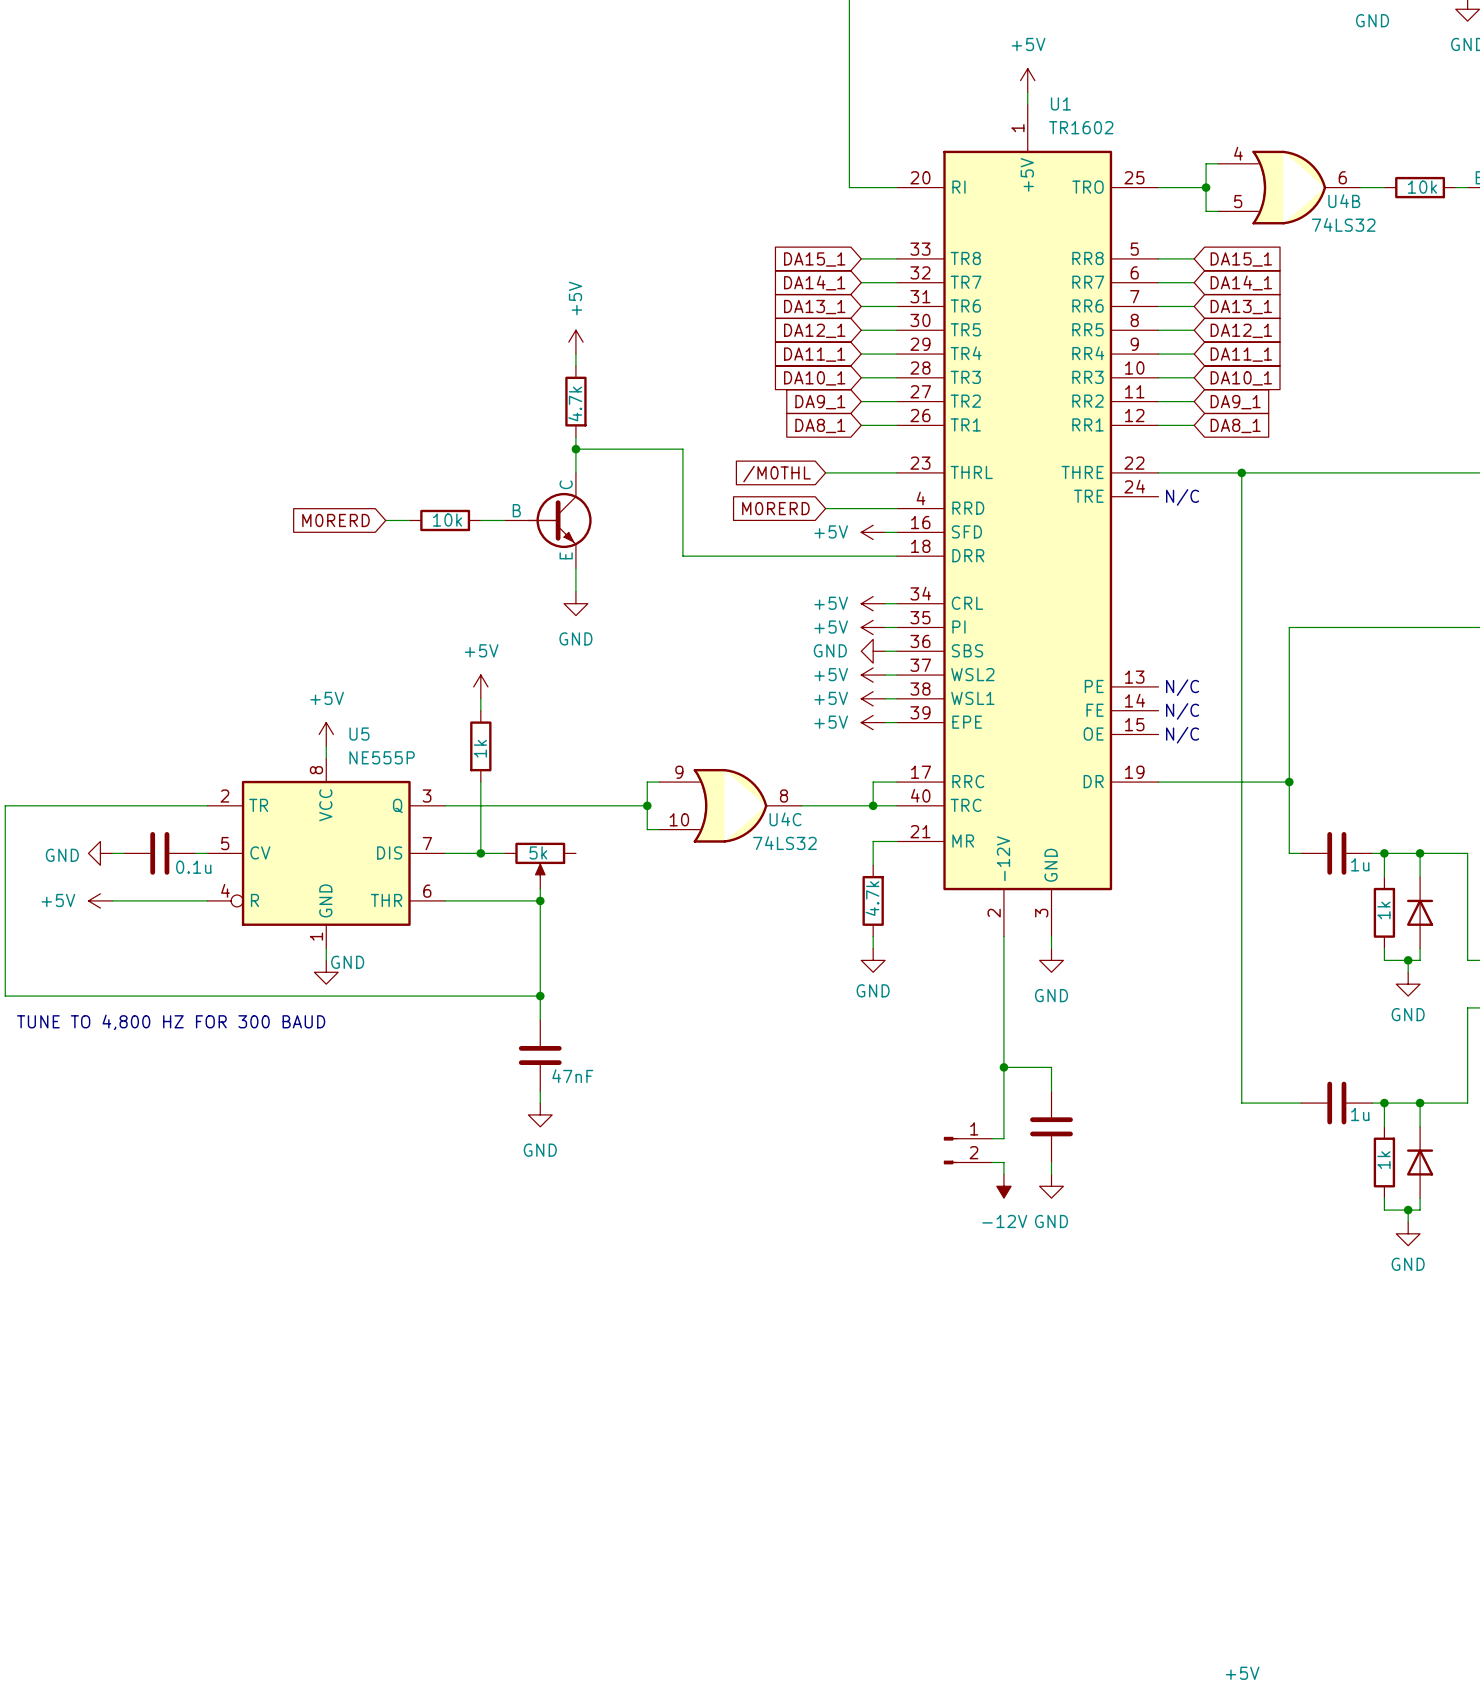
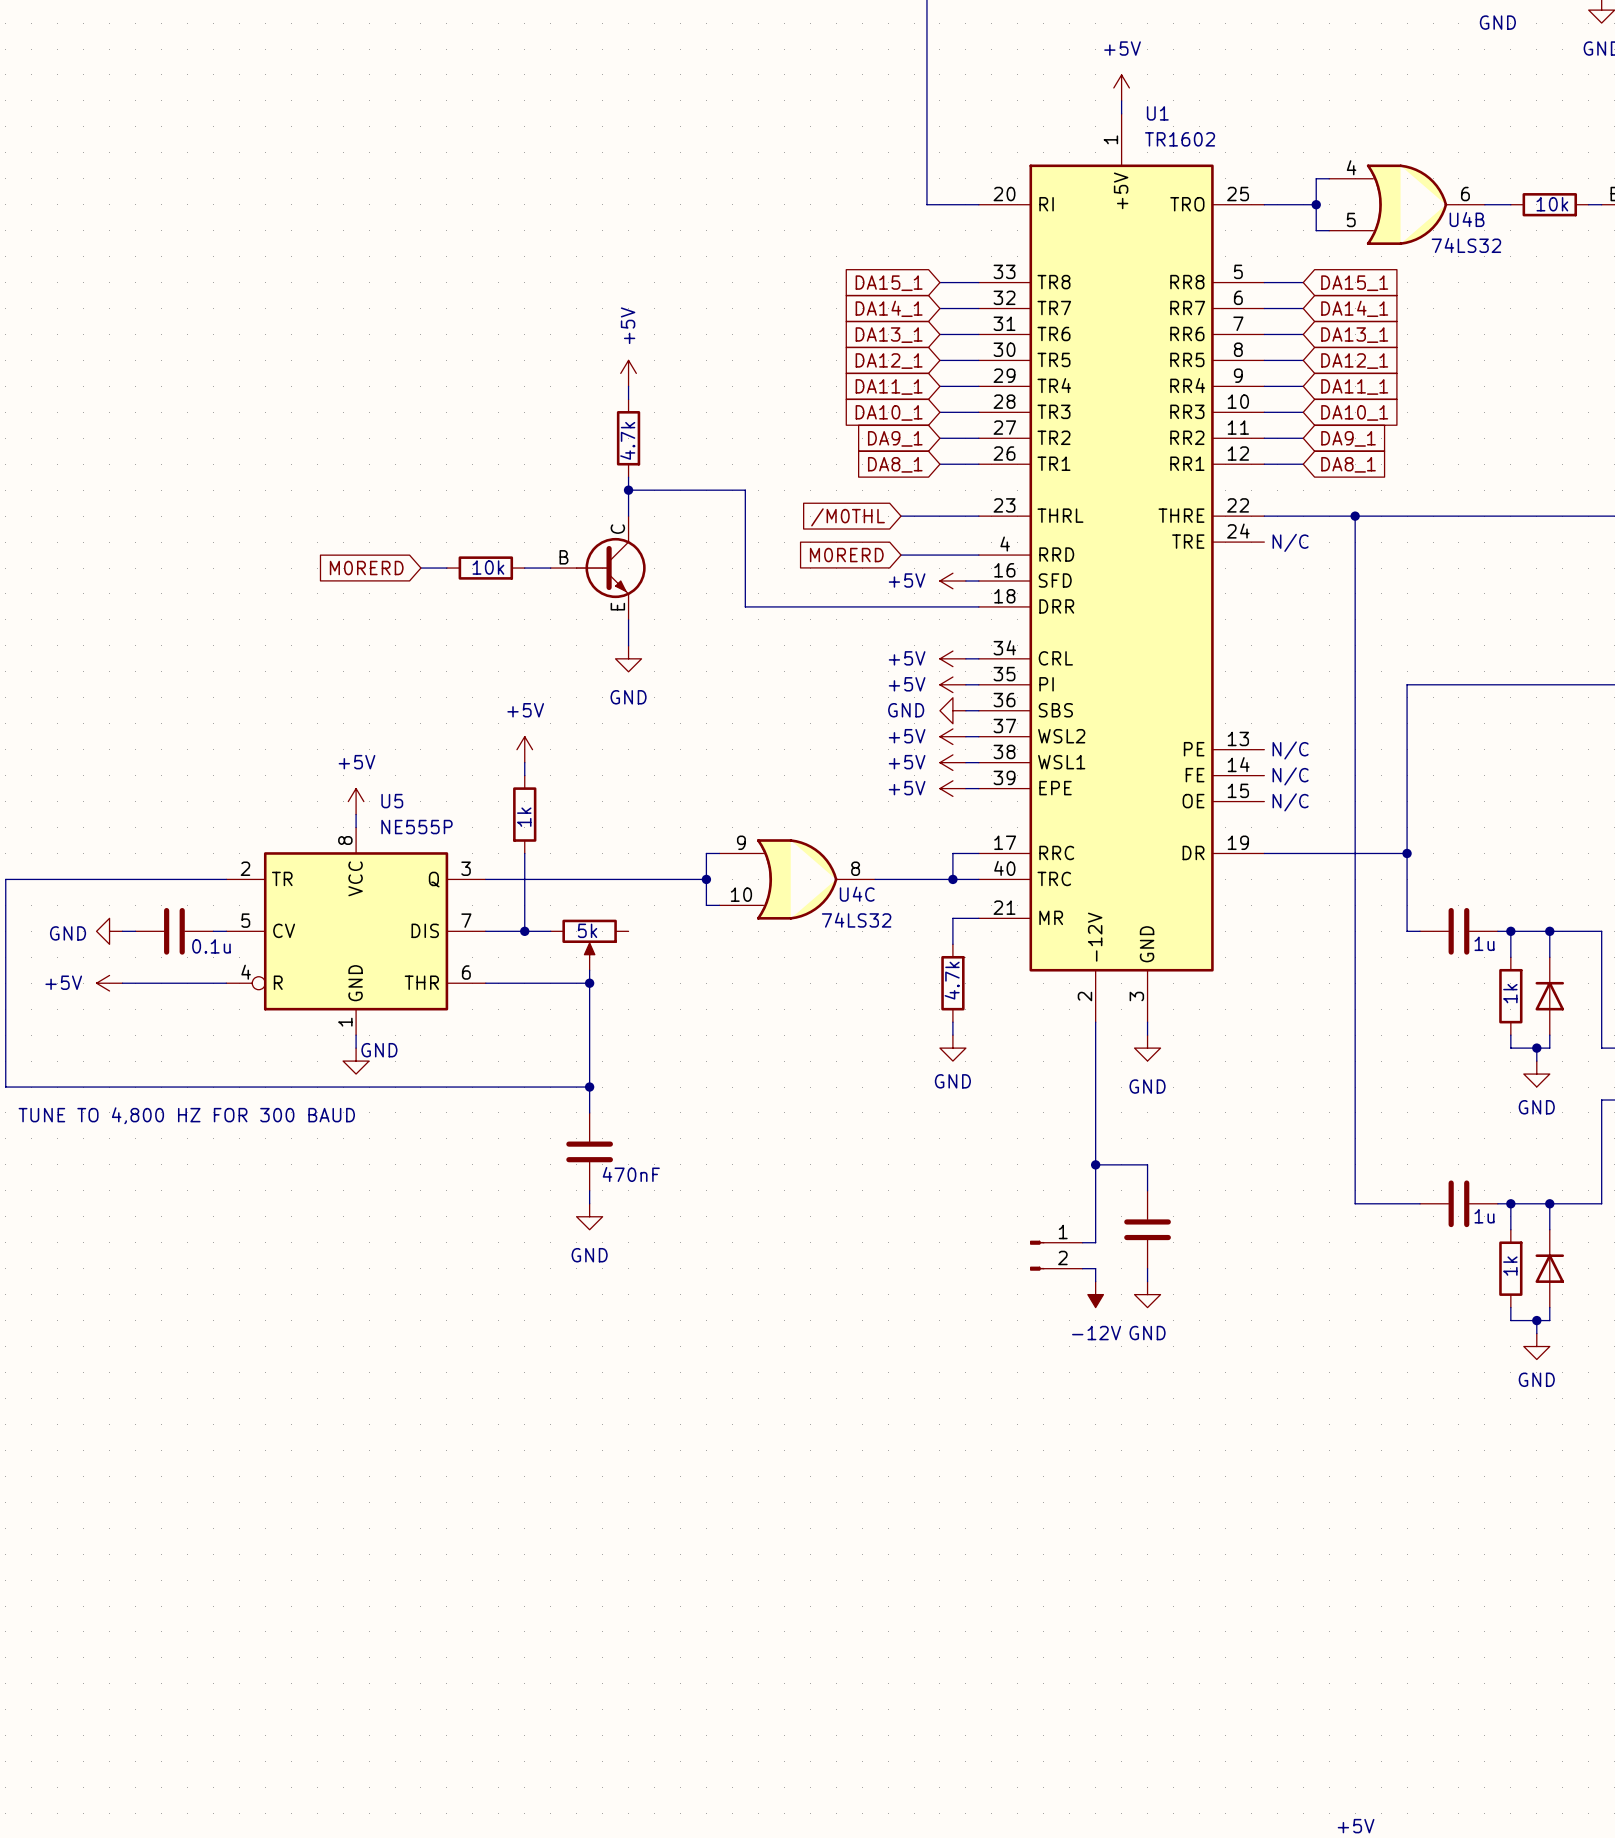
part value: 47nF (572, 1076) -> 470nF (631, 1174)

